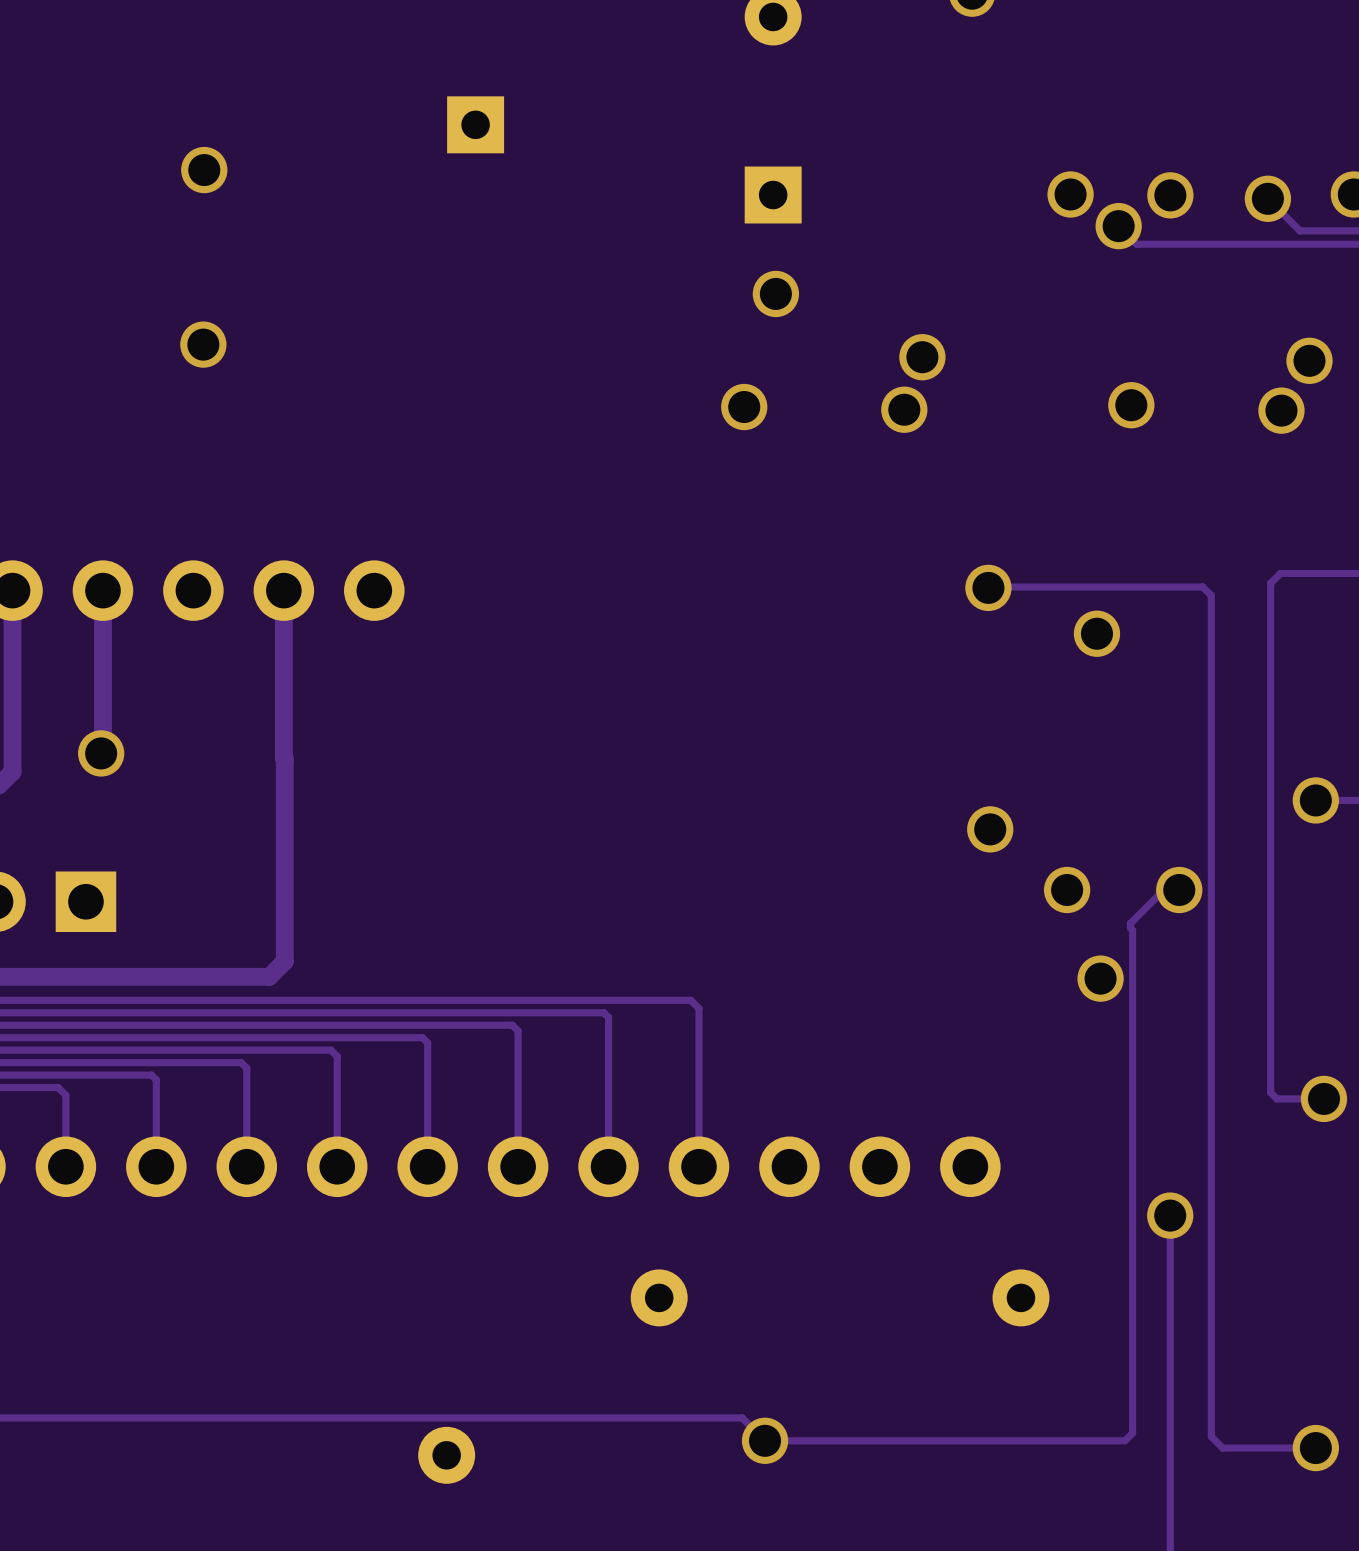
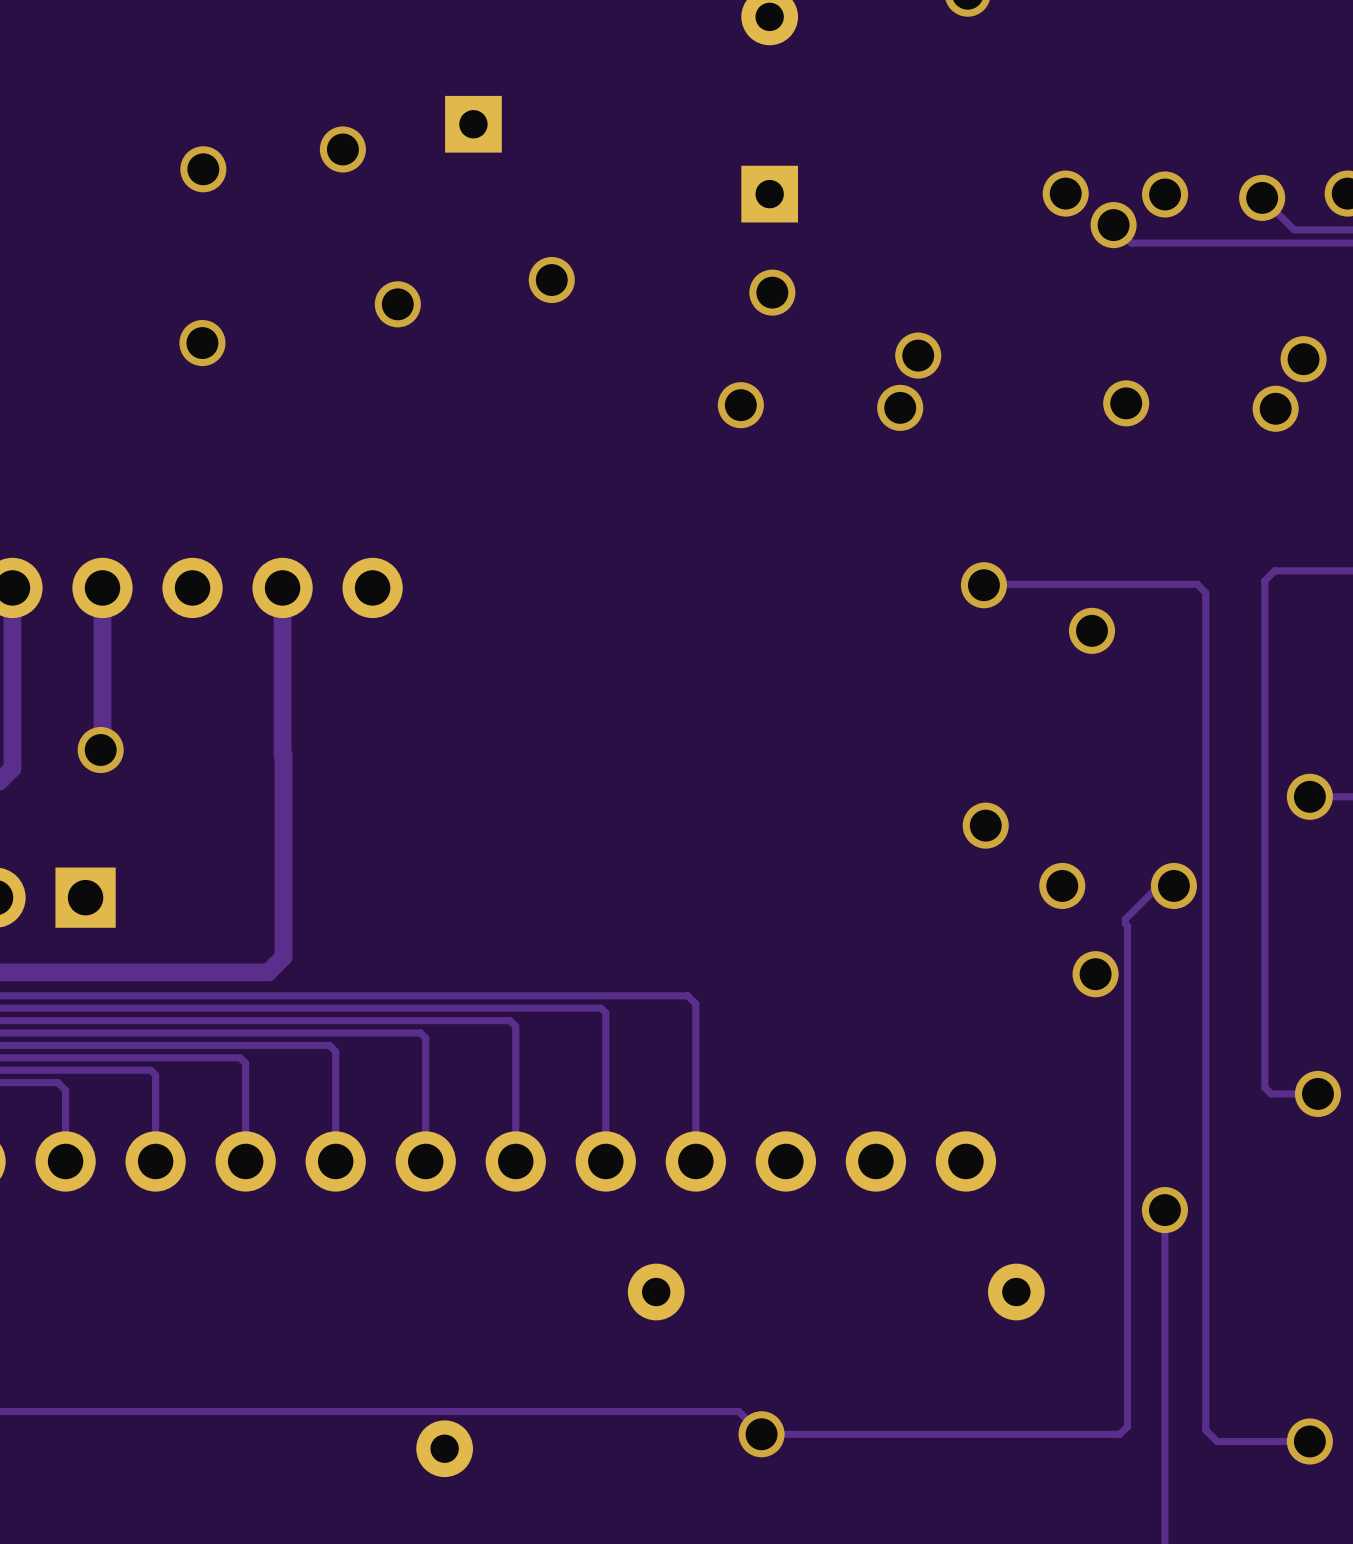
via: none -> (342, 149)
via: none -> (551, 280)
via: none -> (397, 304)

